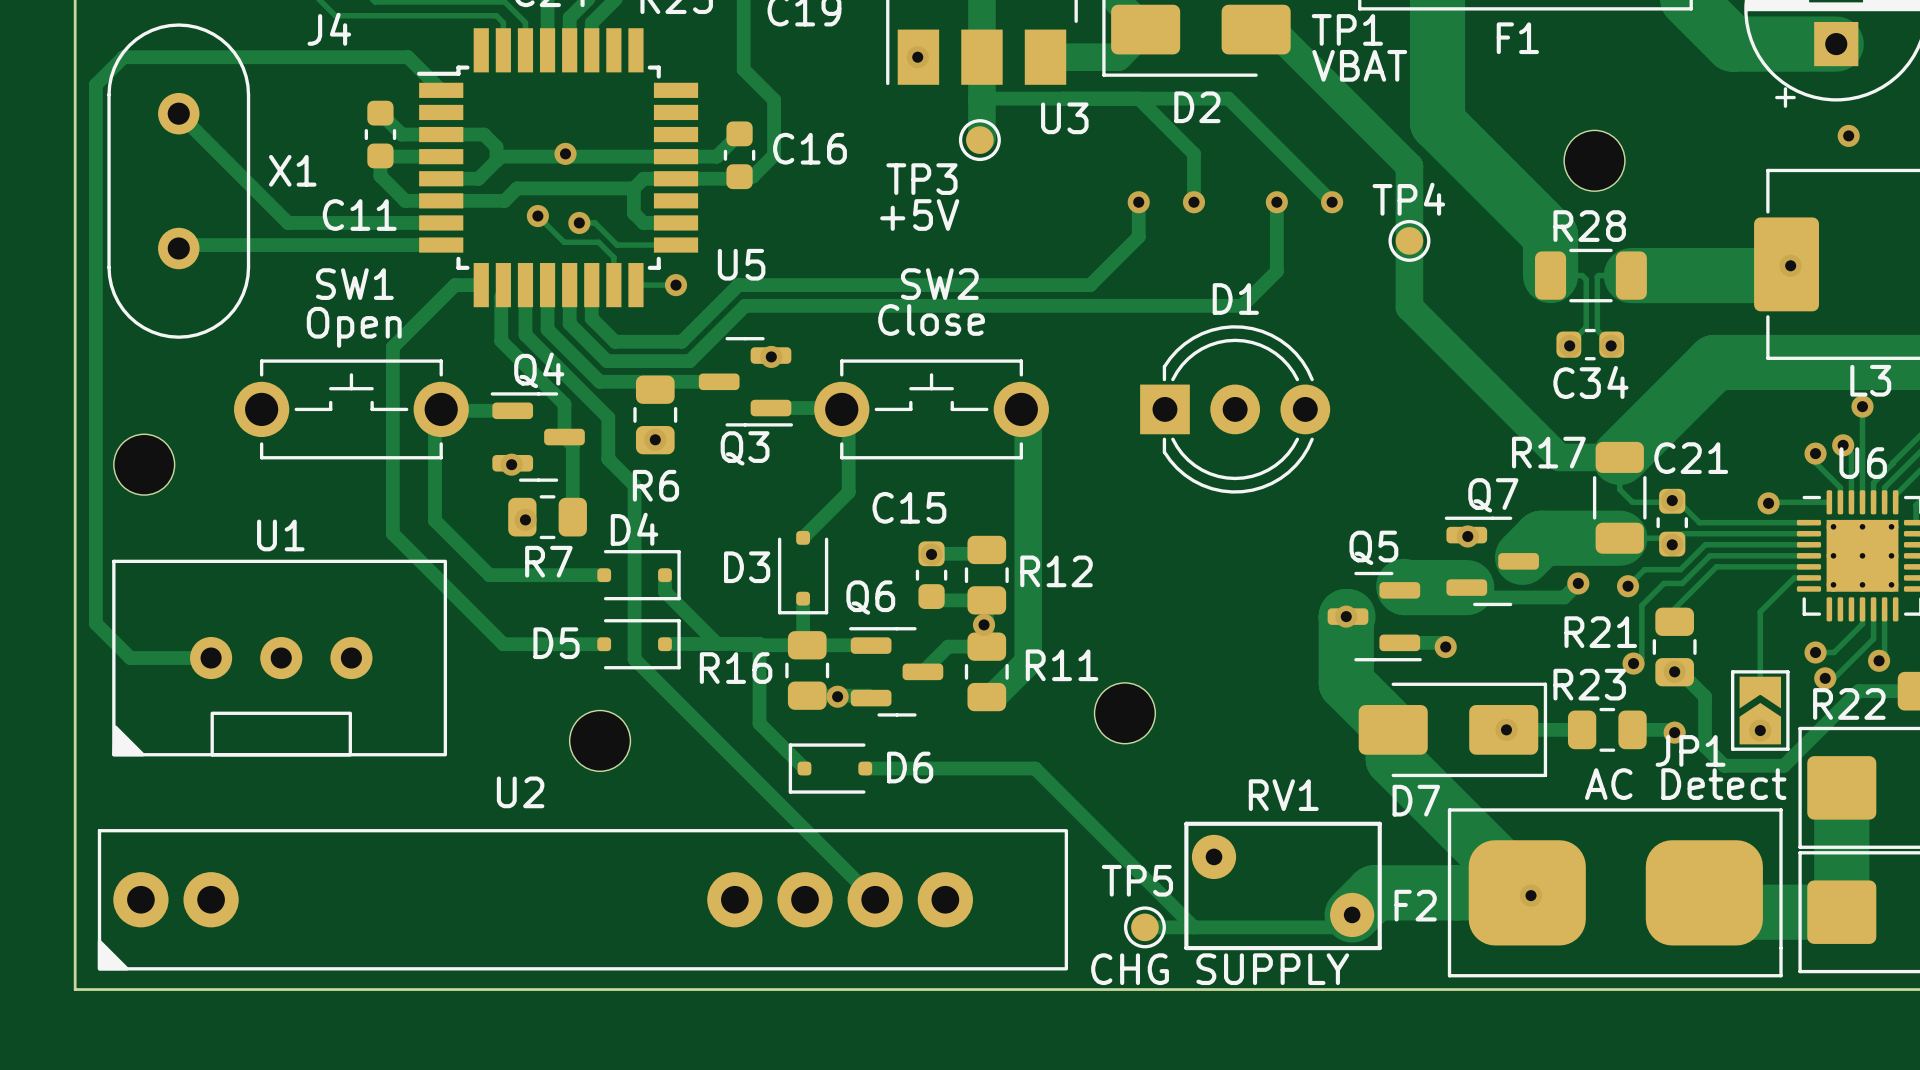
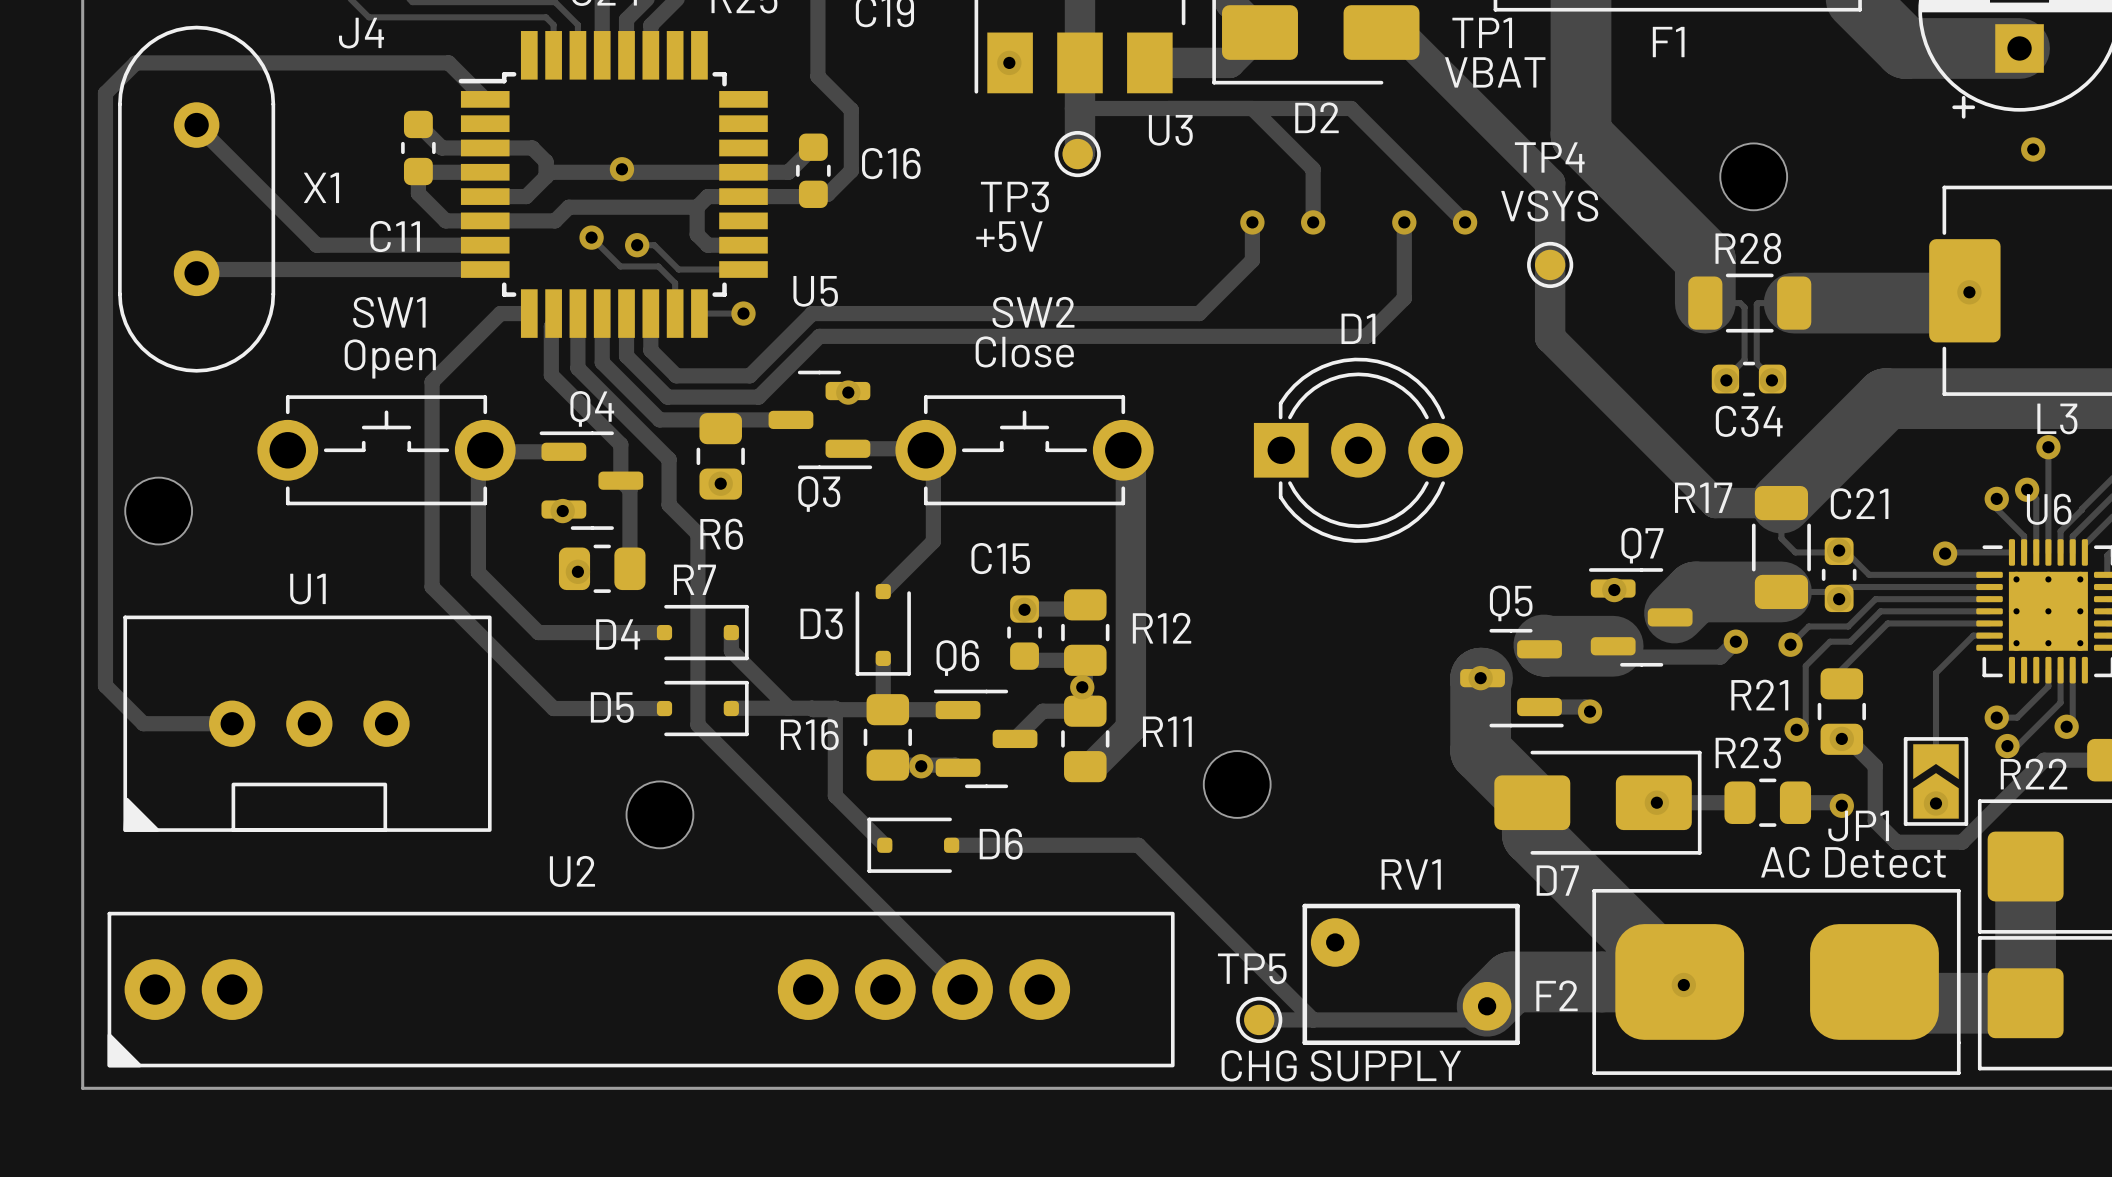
TP4 value: none -> VSYS (1549, 206)
TP4 name position: TP4 (1408, 199) -> TP4 (1549, 157)
D4 name position: D4 (634, 529) -> D4 (618, 634)
R7 name position: R7 (548, 561) -> R7 (694, 579)

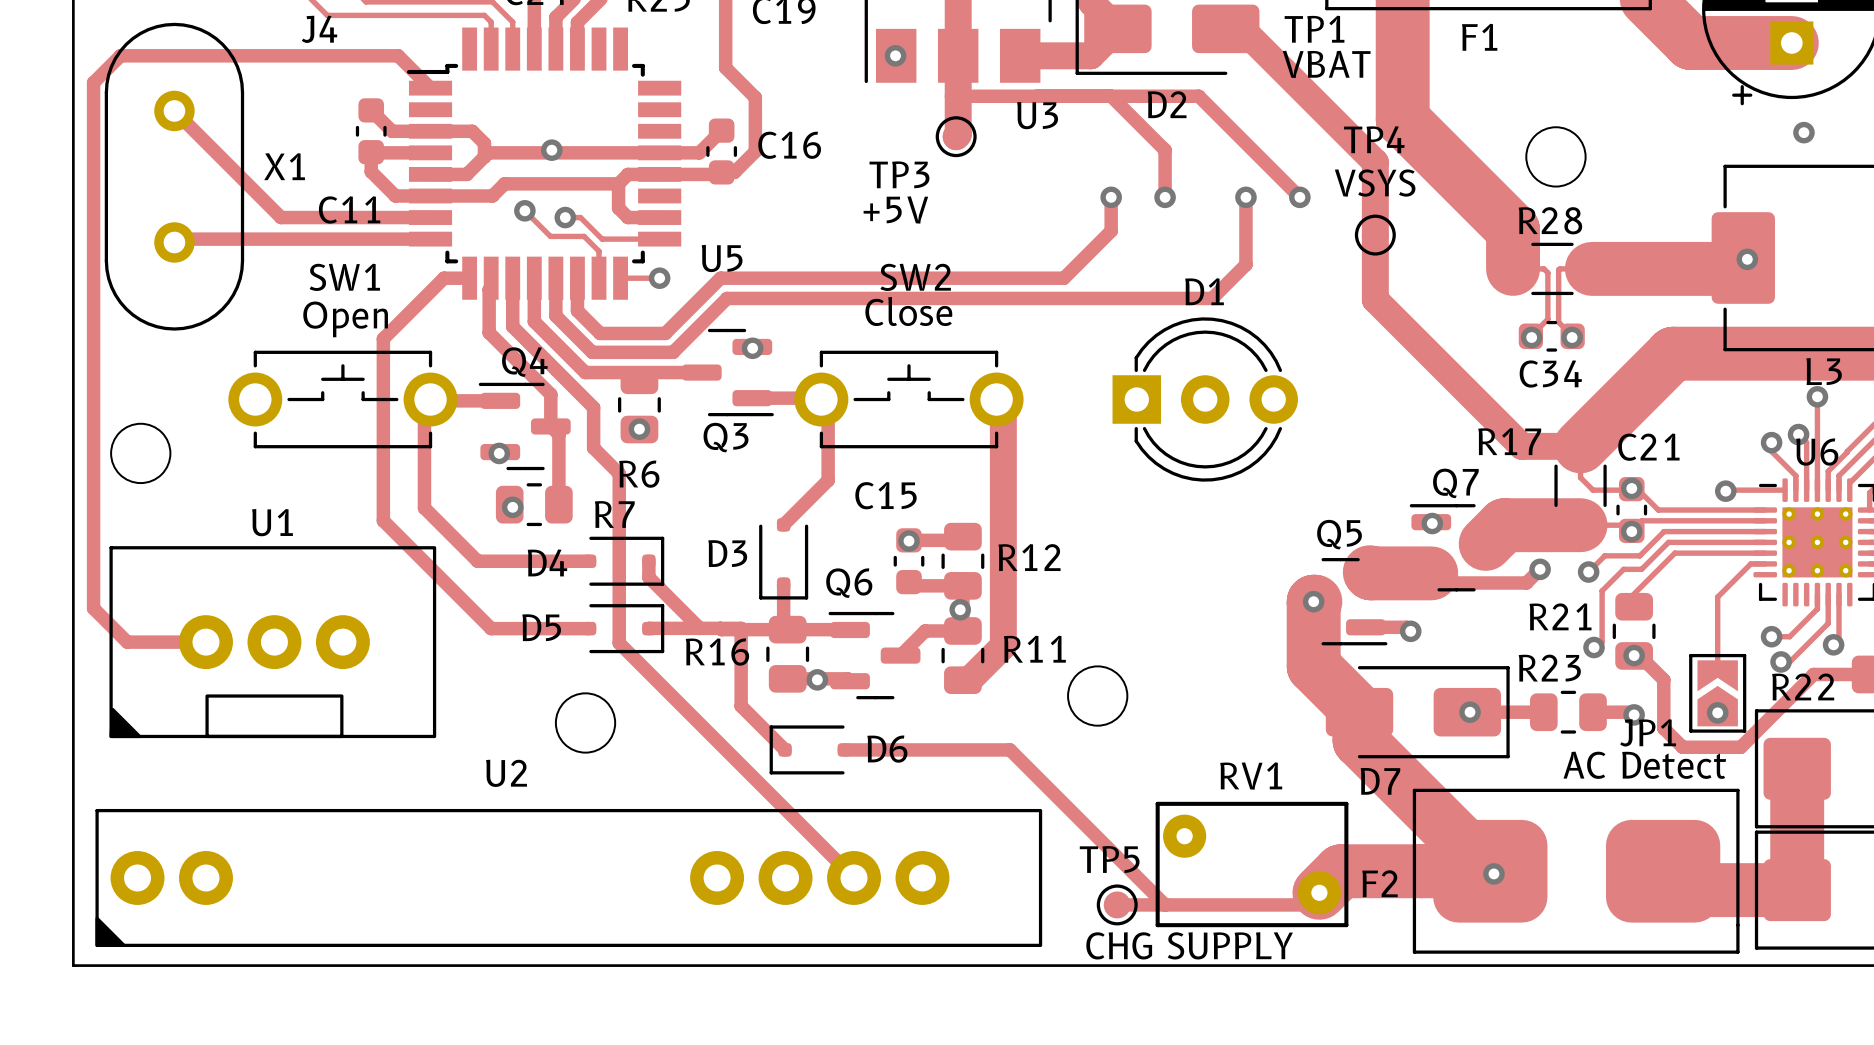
U1 footprint: [123, 615, 492, 832] -> [109, 546, 437, 739]

